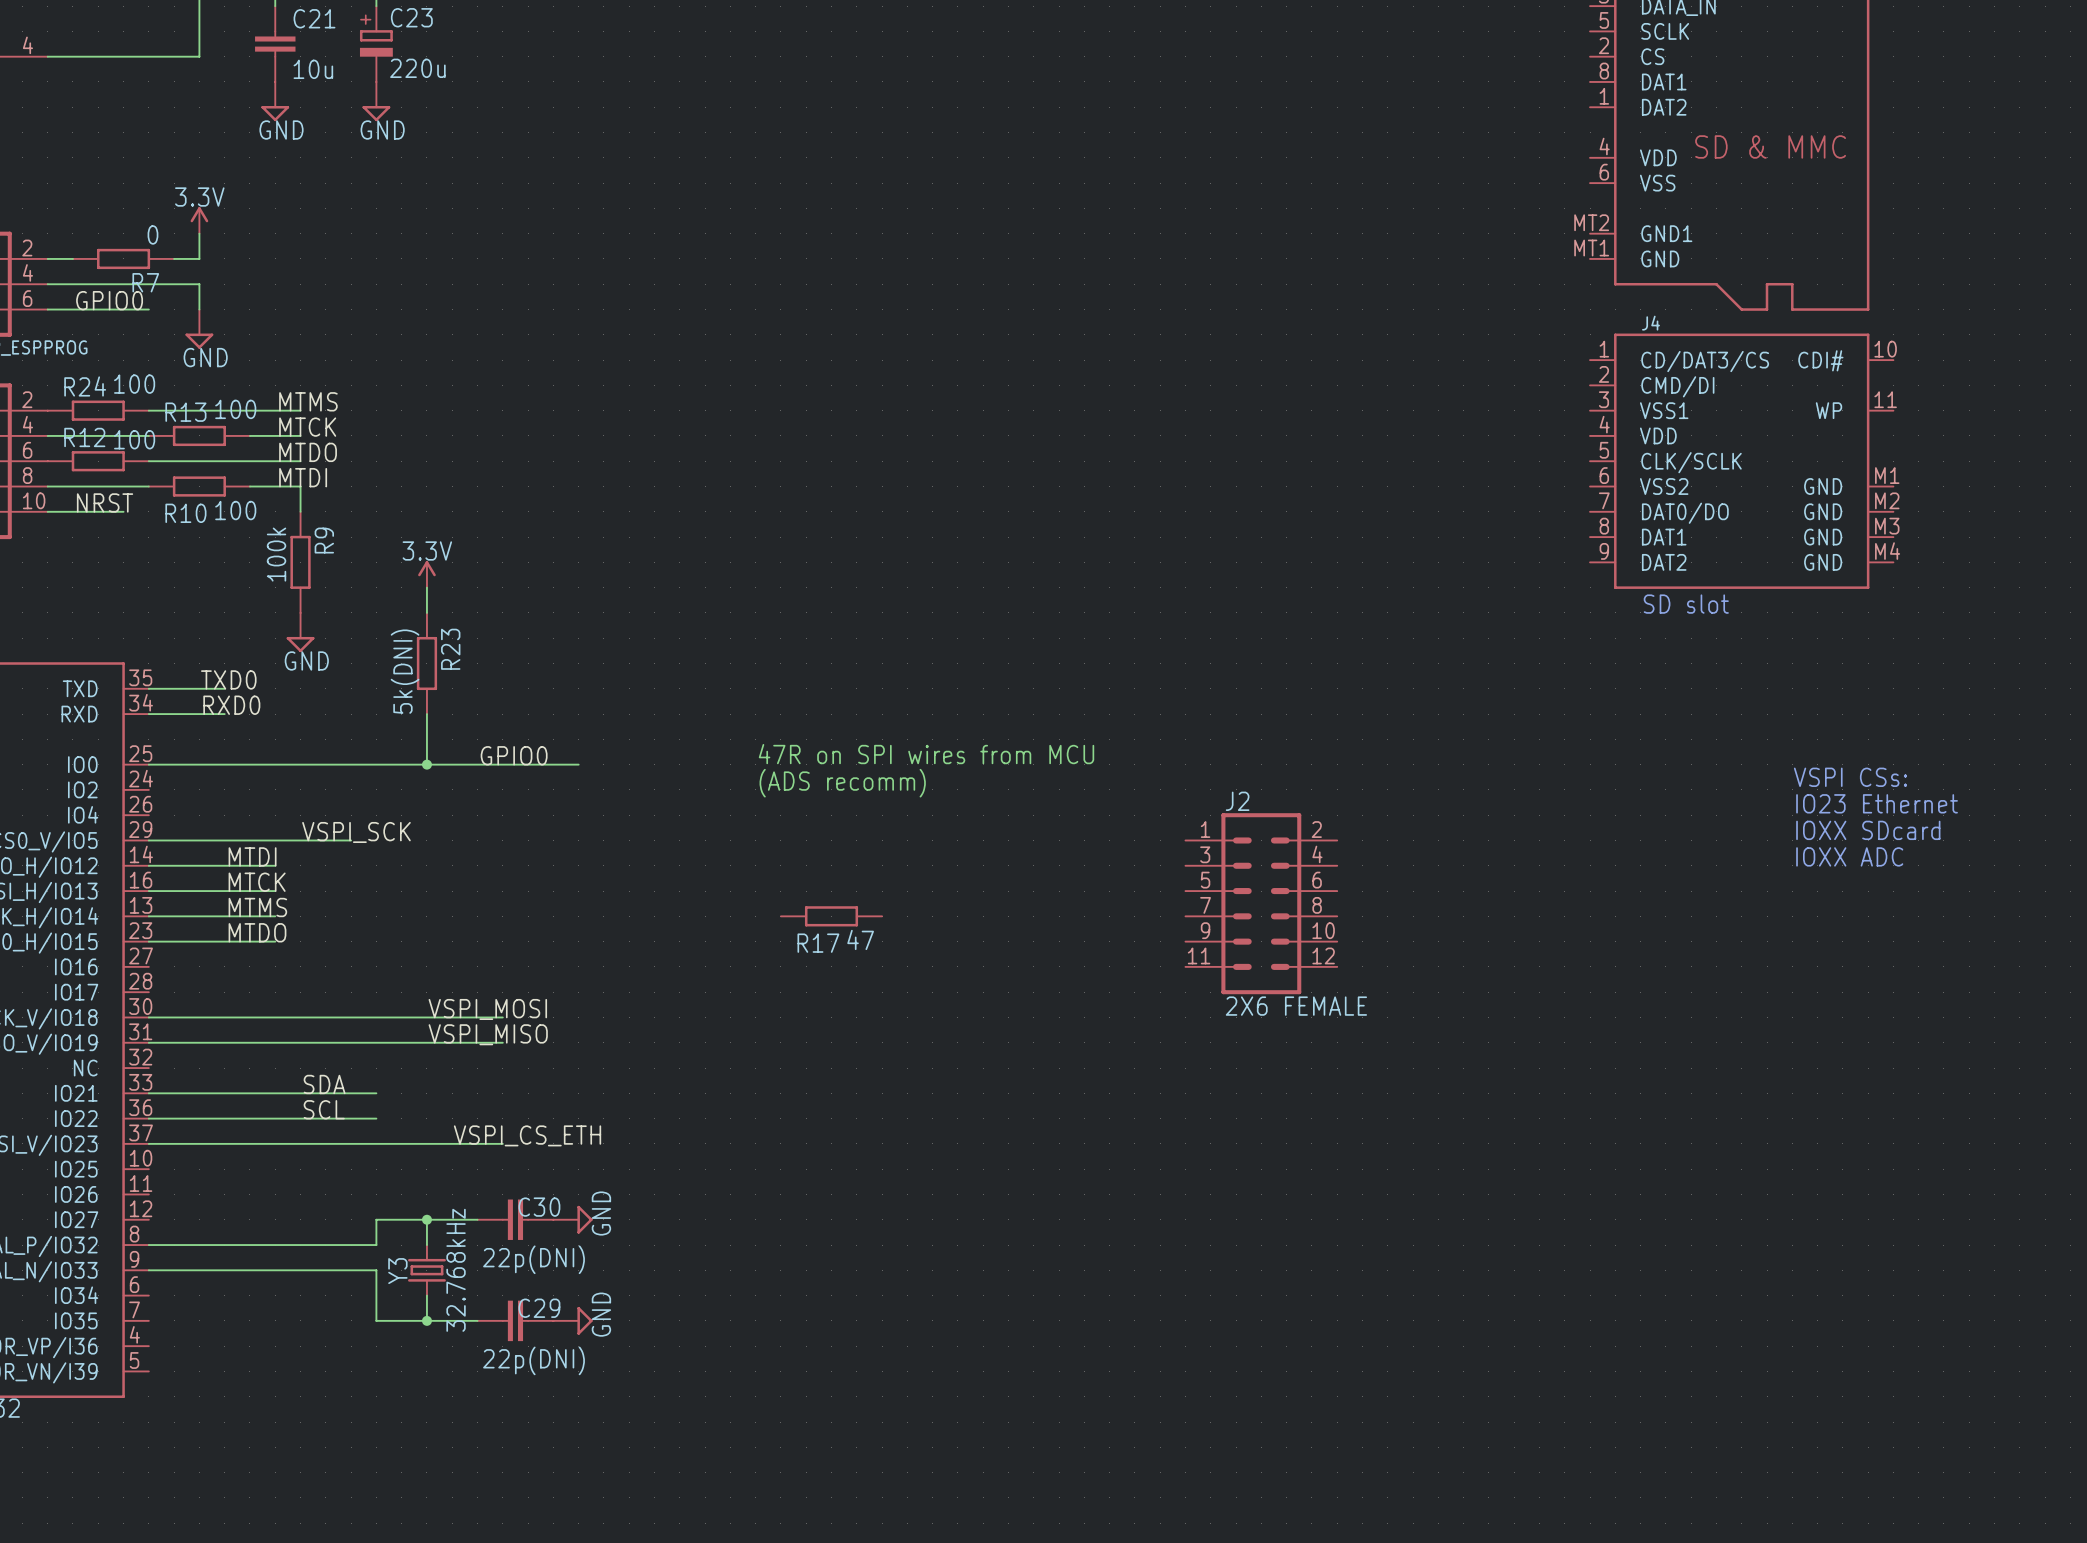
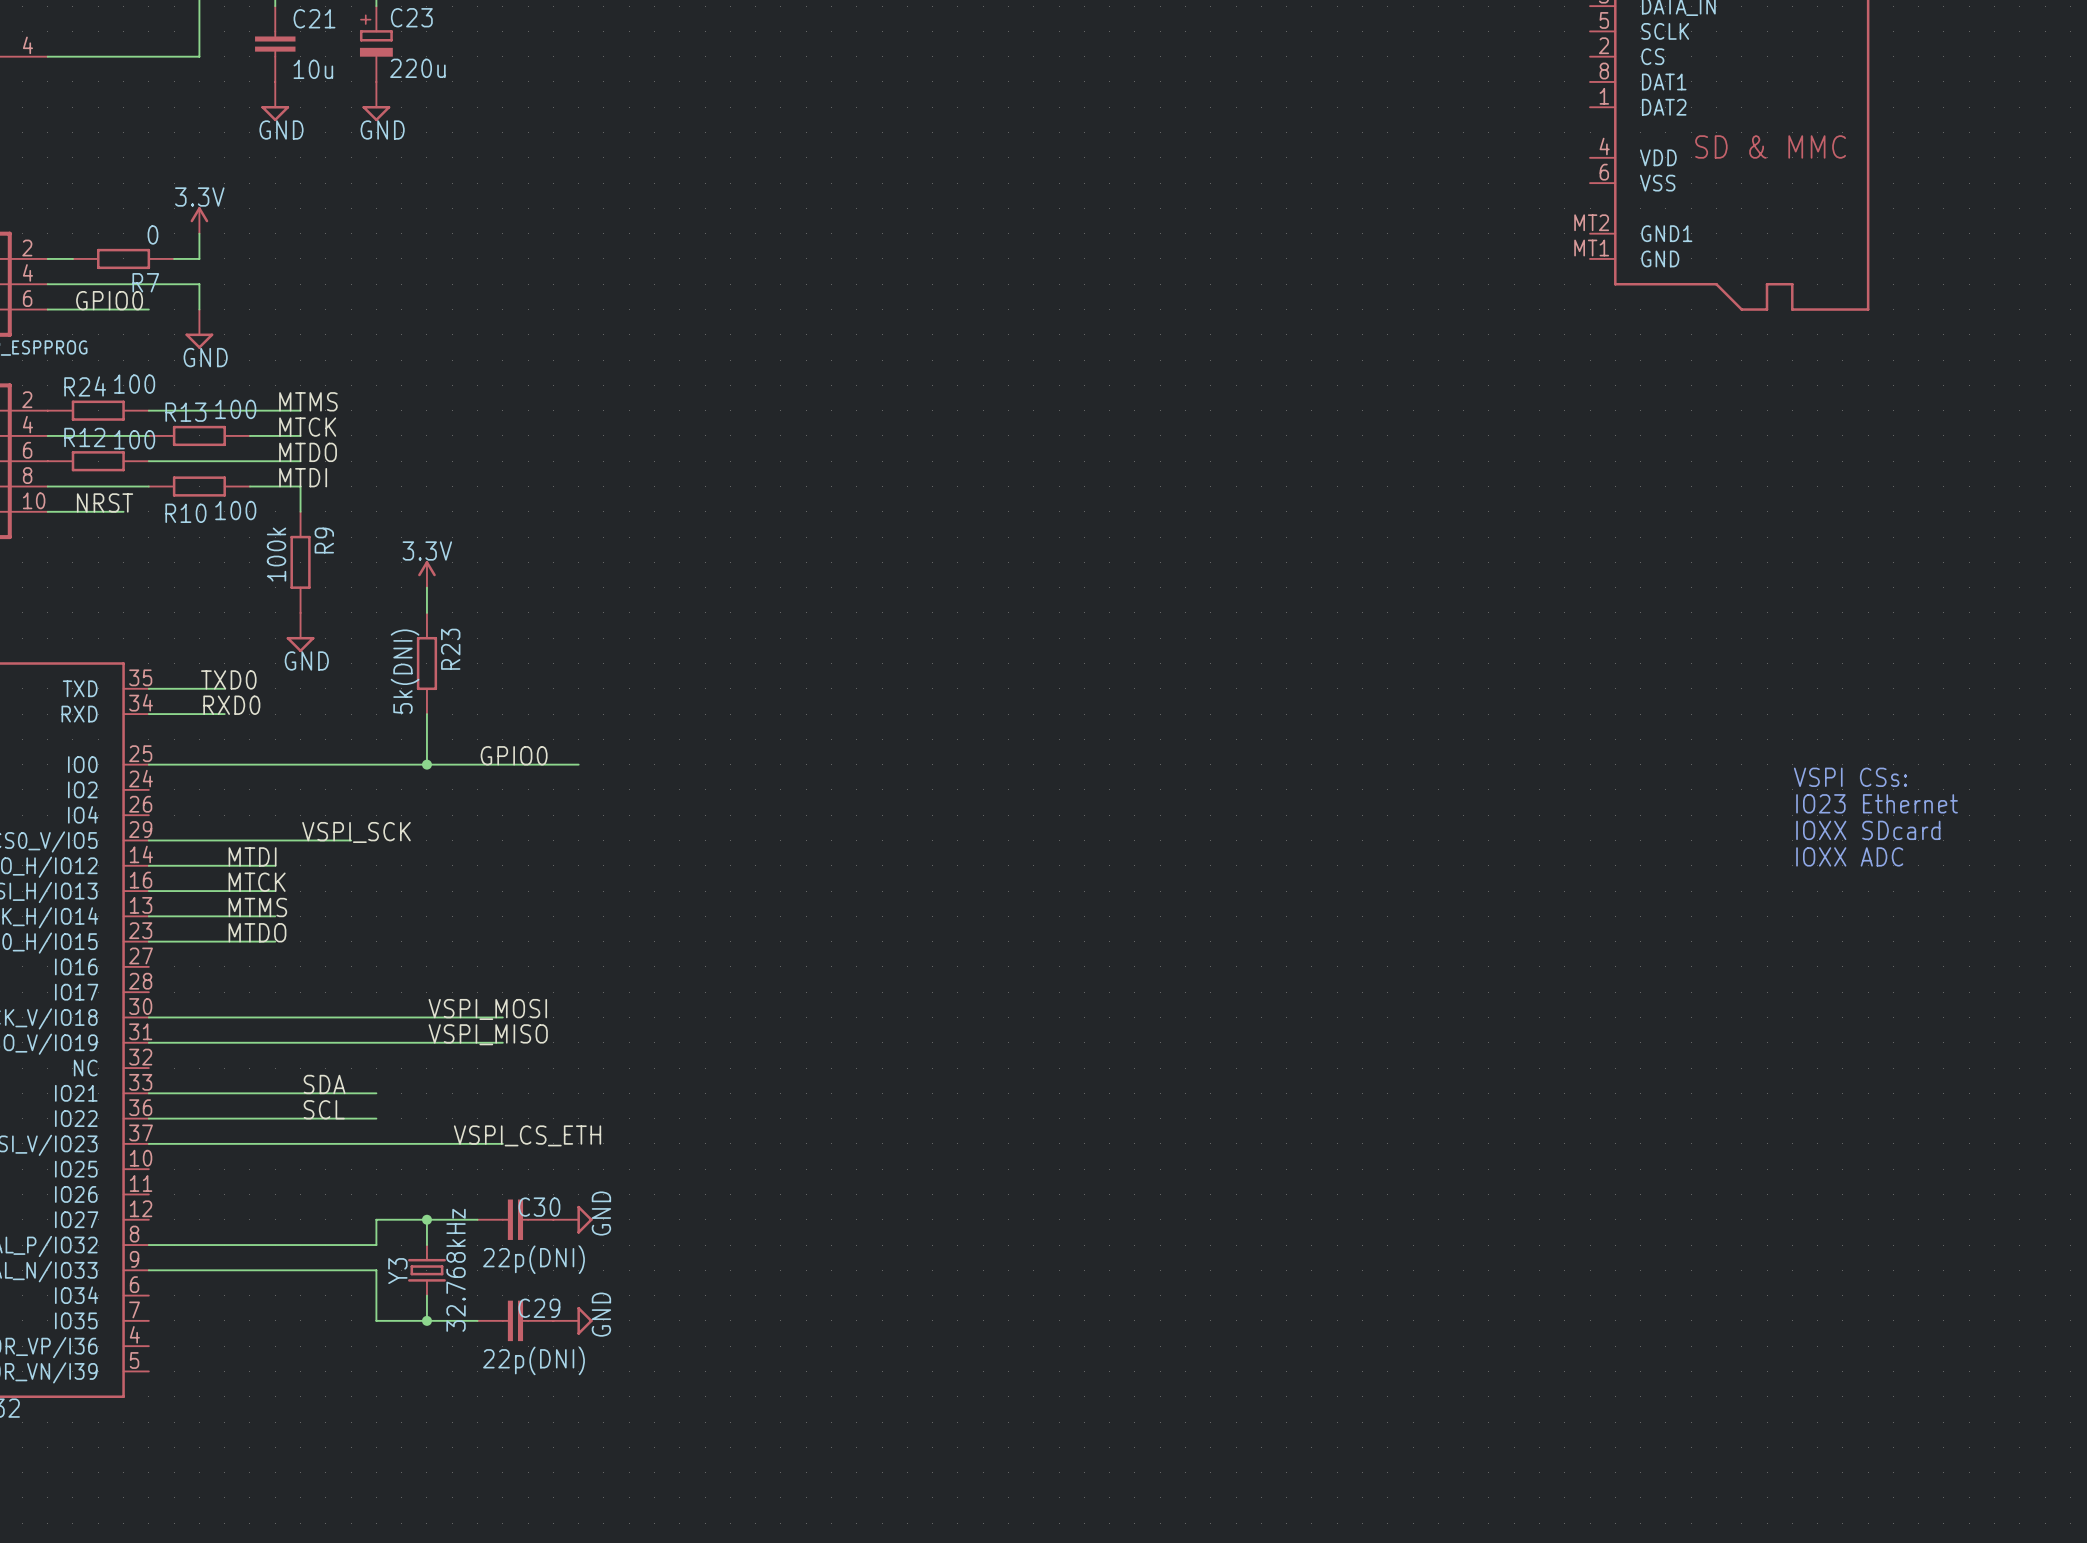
J4: (1741, 461) -> none
text: SD slot (1686, 604) -> none
text: 47R on SPI wires from MCU (926, 754) -> none
text: (ADS recomm) (842, 783) -> none
J2: 2X6 FEMALE (1261, 903) -> none
R17: 47 (831, 916) -> none

